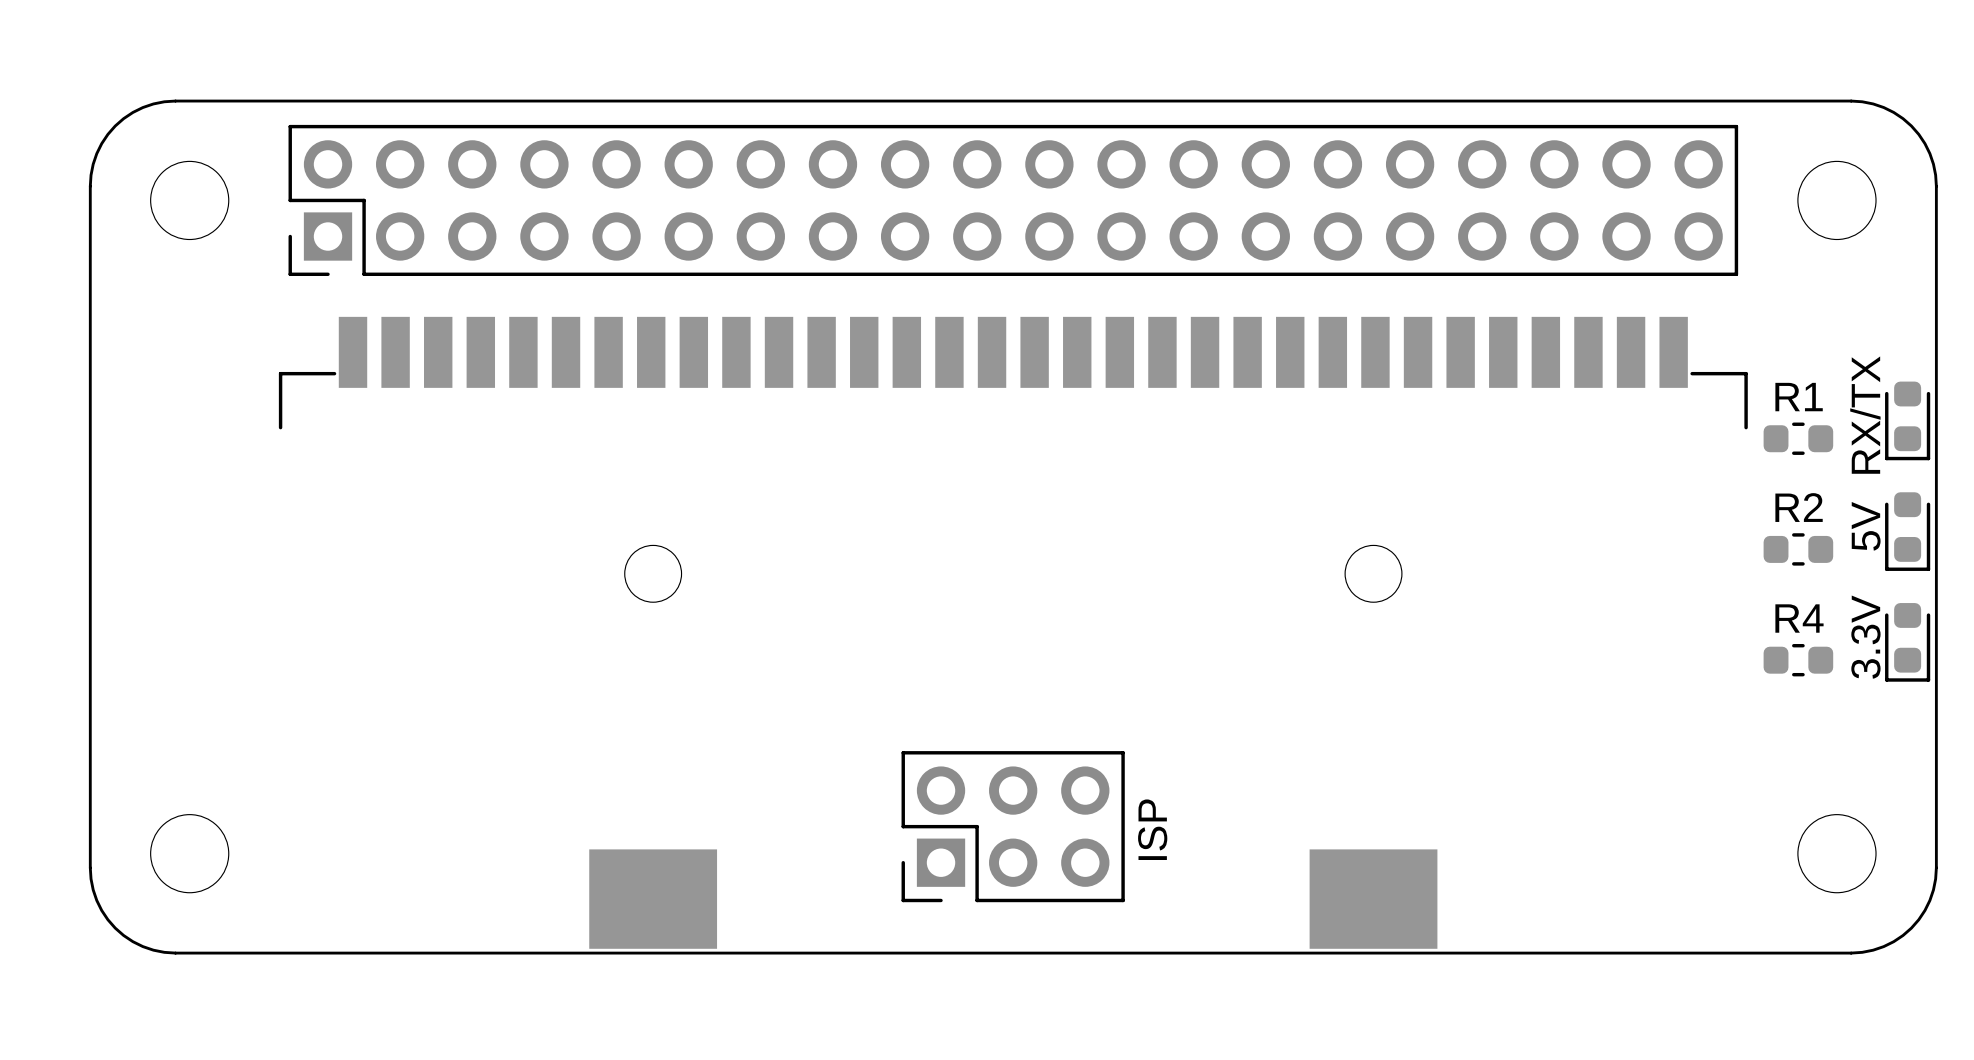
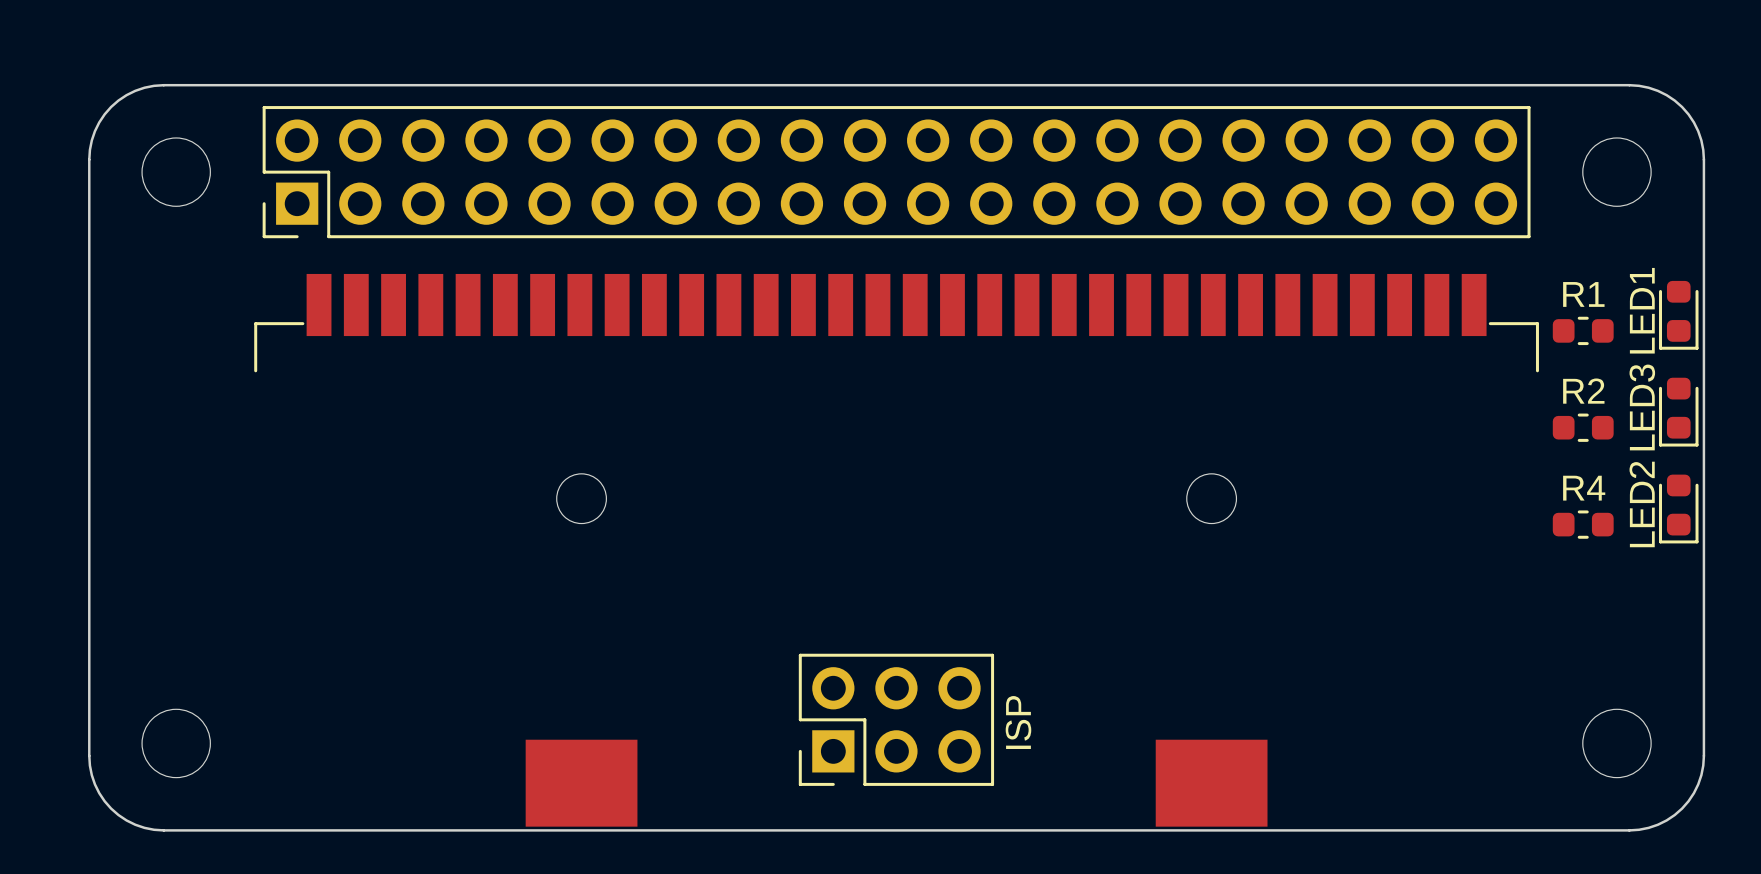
LED1: none -> (1678, 315)
RX/TX: (1907, 420) -> none
R1 position: (1798, 438) -> (1583, 330)
LED3: none -> (1678, 412)
5V: (1907, 531) -> none
R2 position: (1798, 549) -> (1583, 427)
LED2: none -> (1678, 509)
3.3V: (1907, 642) -> none
R4 position: (1798, 660) -> (1583, 524)

